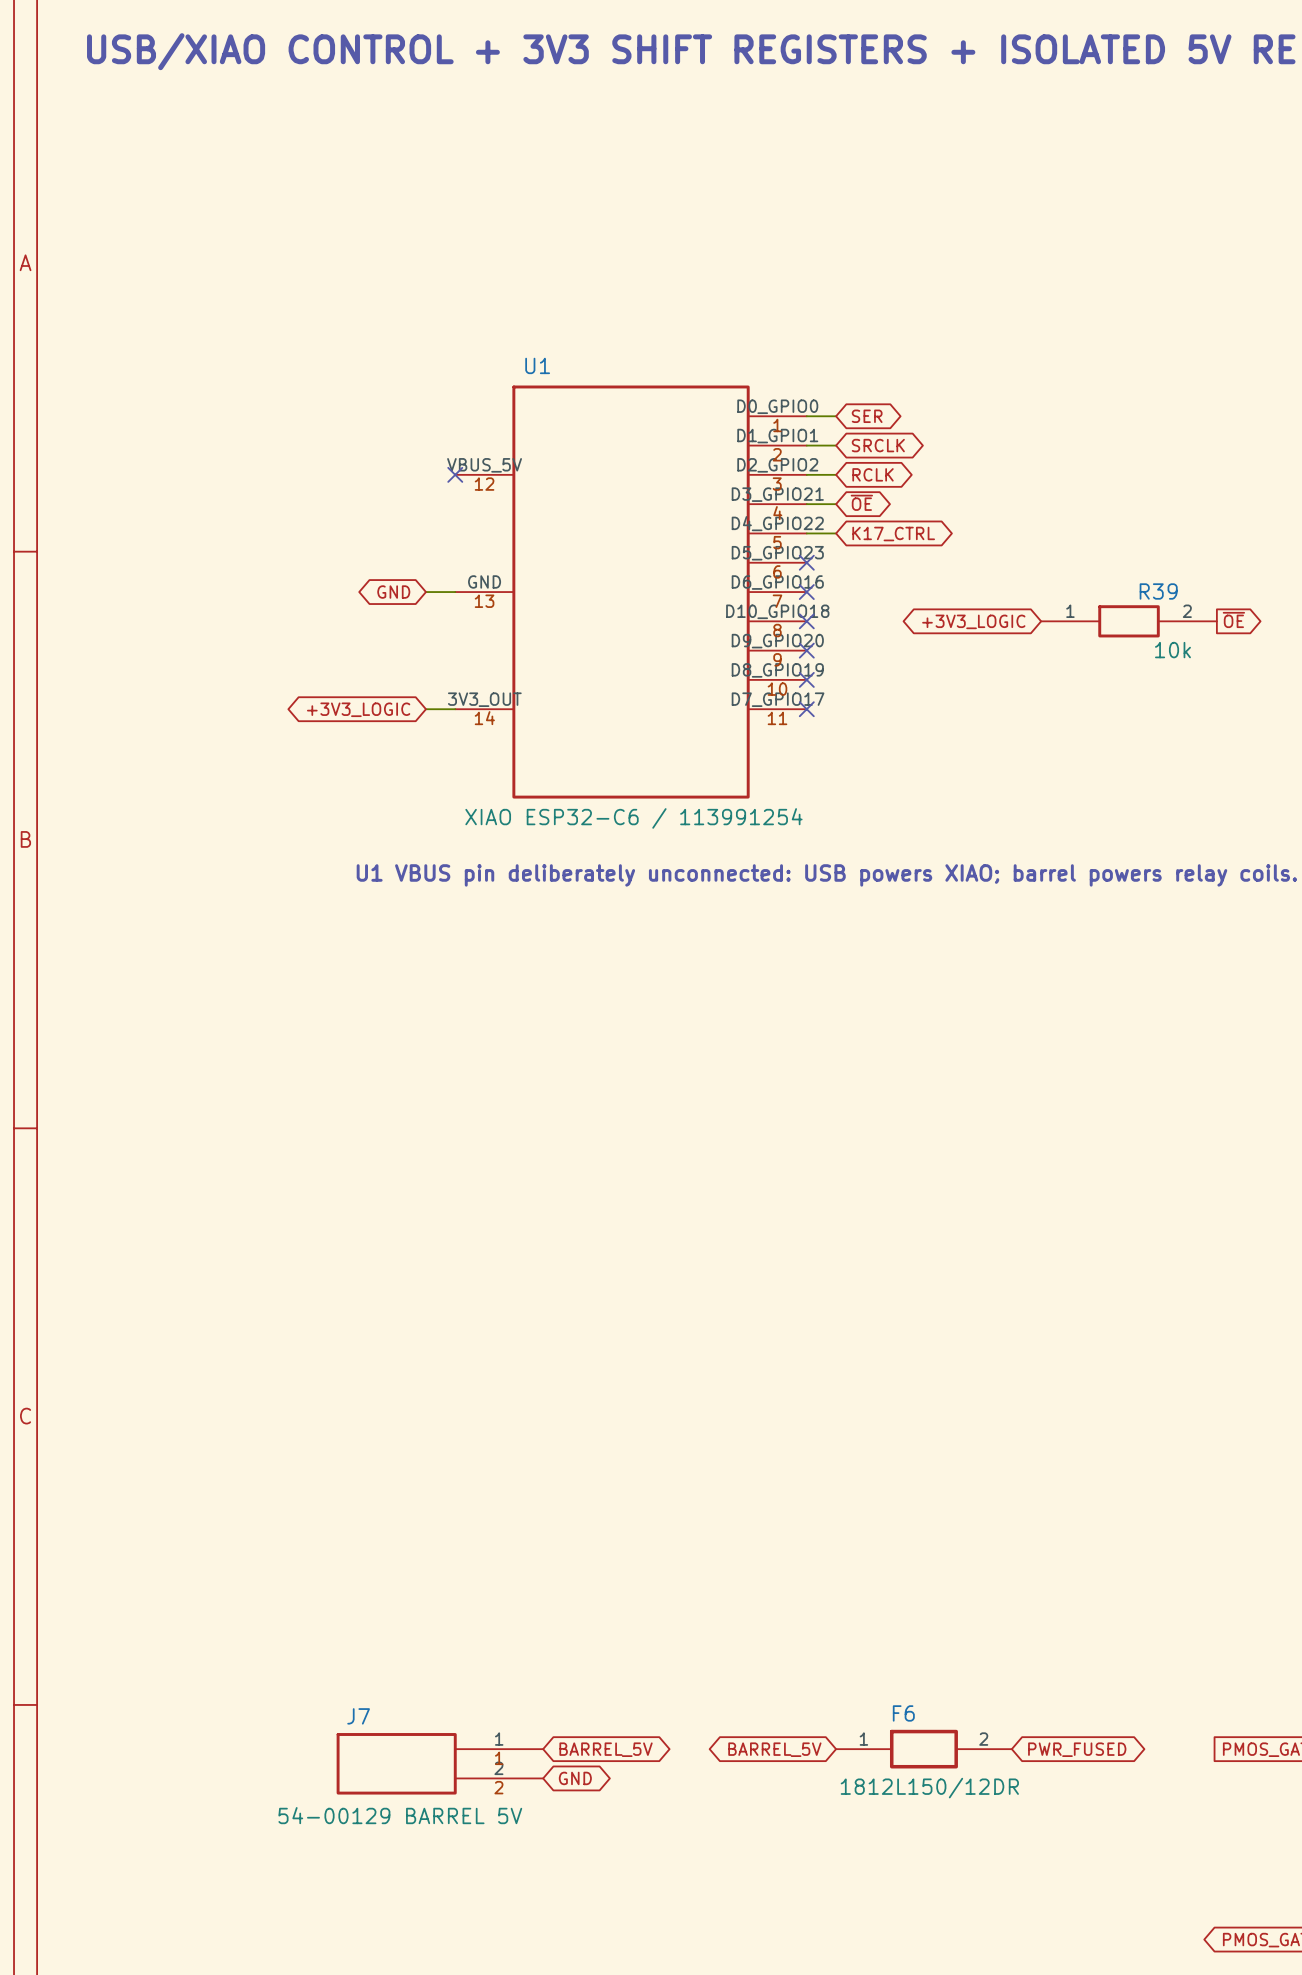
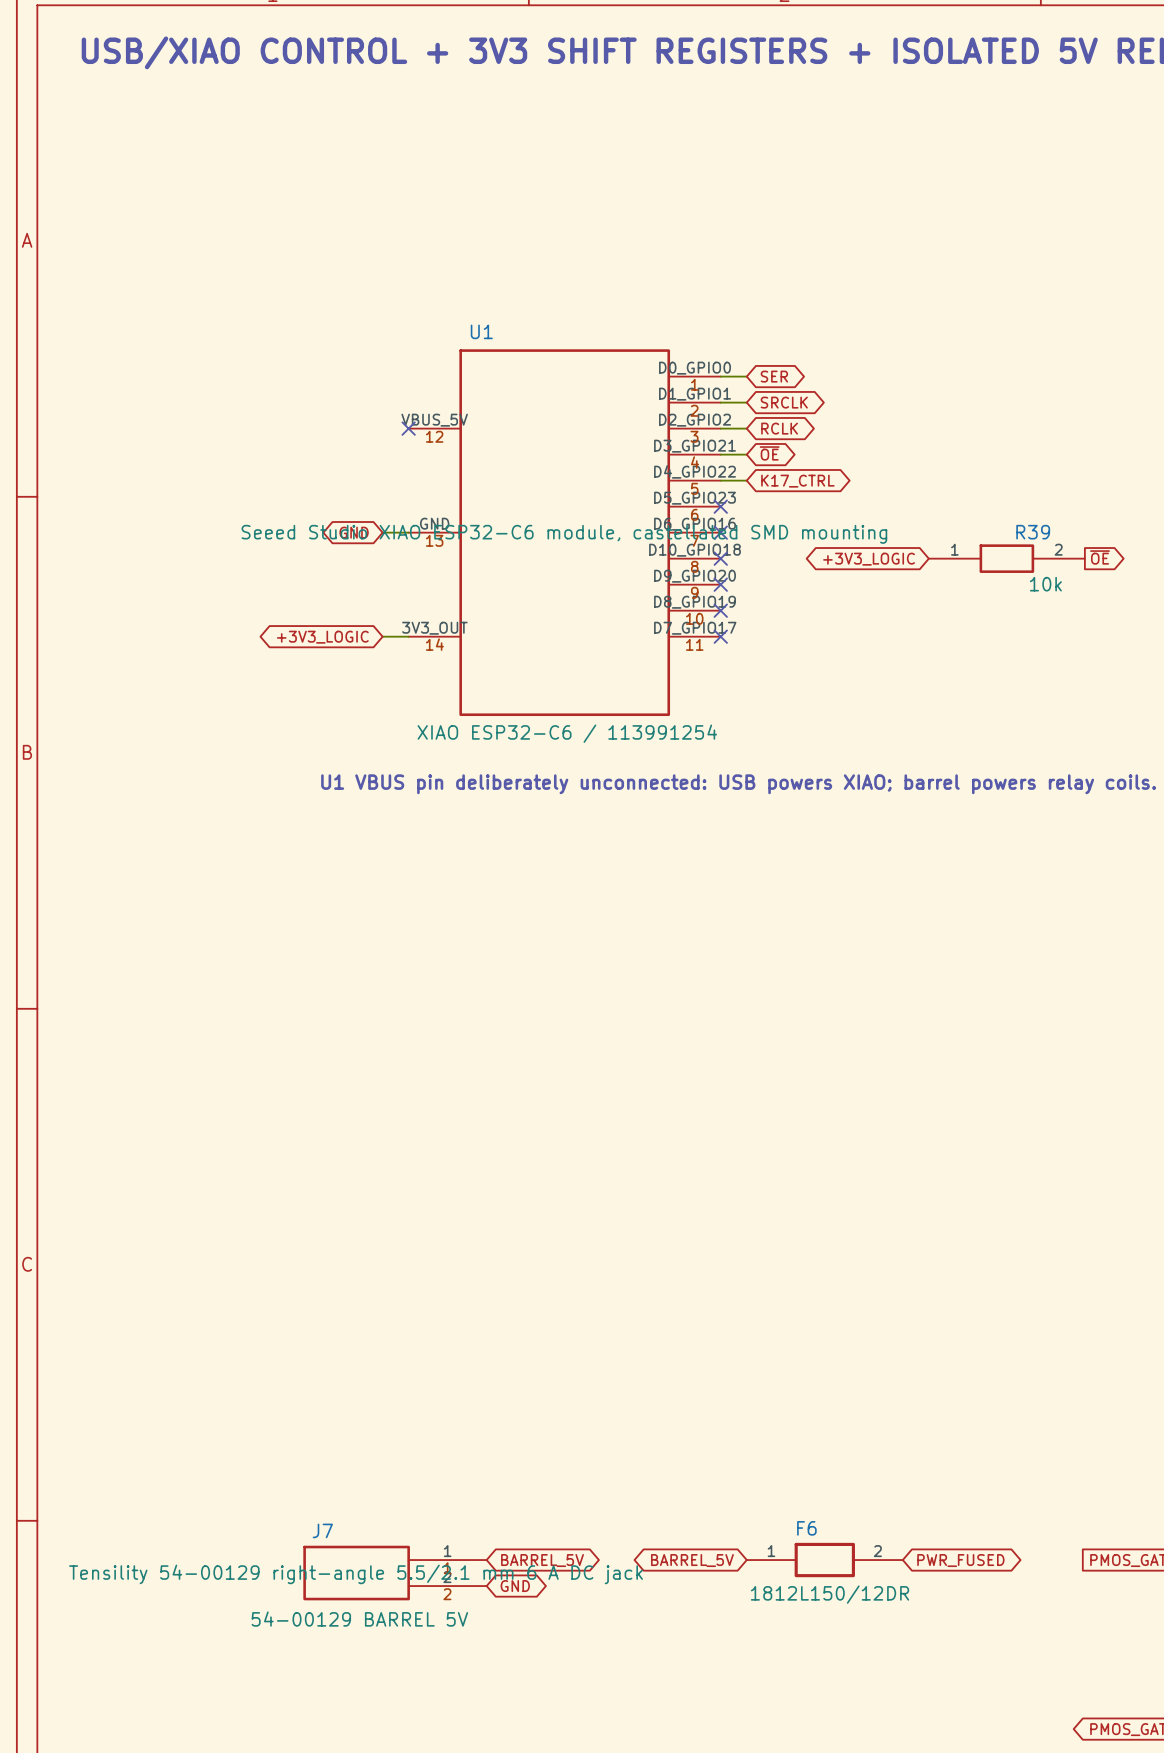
U1 text: none -> Seeed Studio XIAO ESP32-C6 module, castellated SMD mounting (564, 534)
J7 text: none -> Tensility 54-00129 right-angle 5.5/2.1 mm 6 A DC jack (356, 1574)

